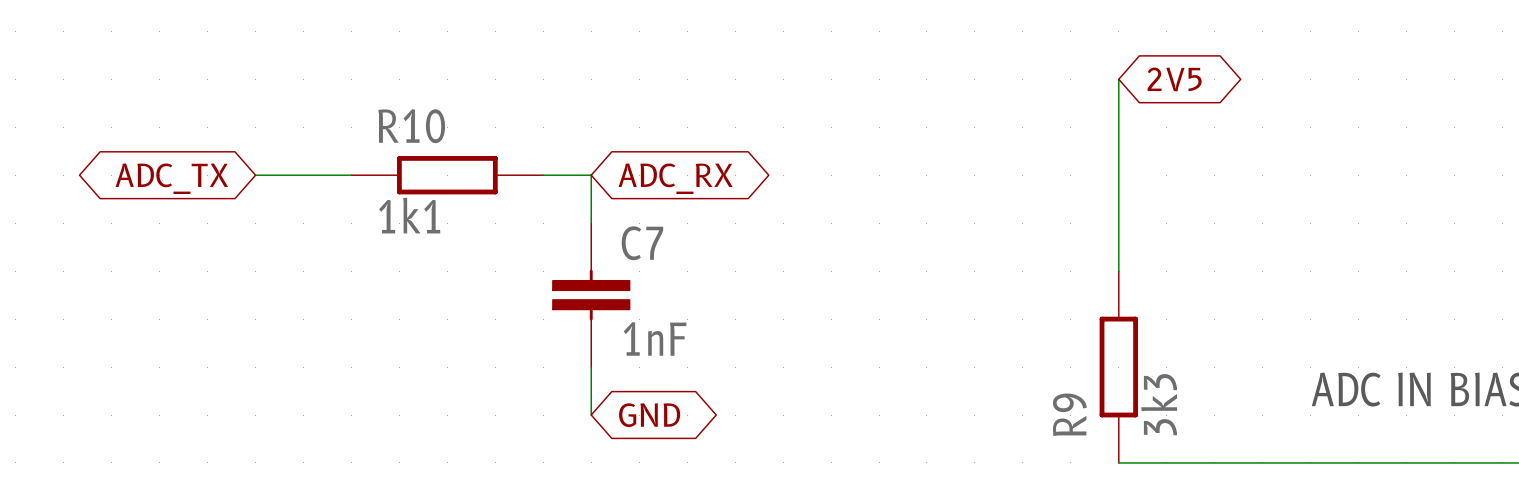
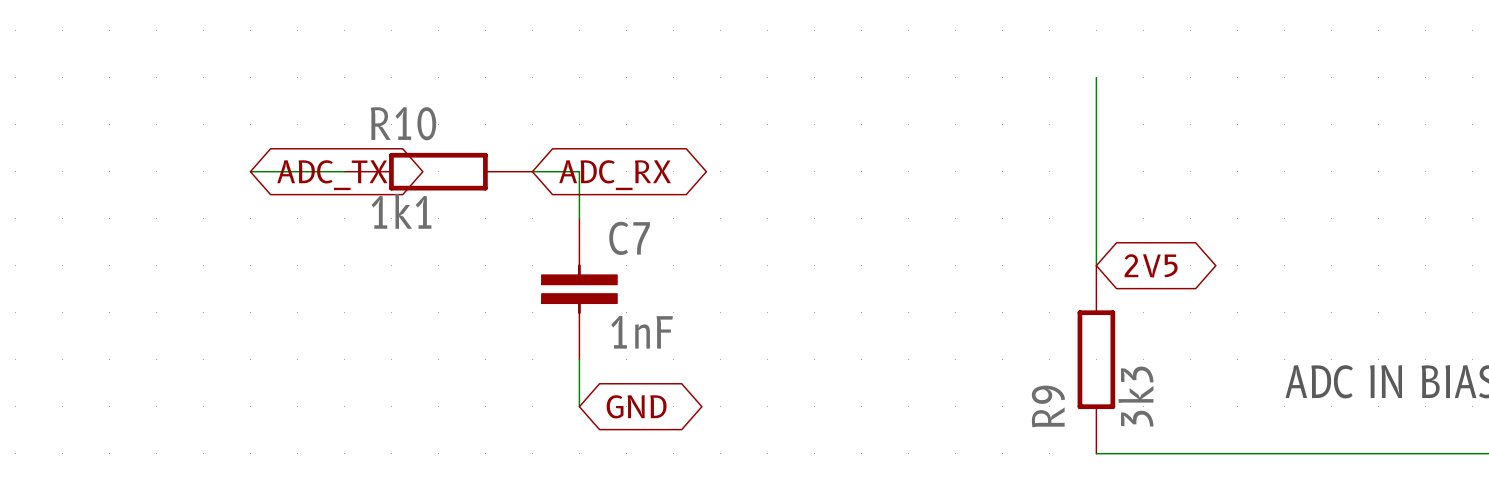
global label position: 2V5 (1174, 79) -> 2V5 (1151, 265)
global label rotation: 0° (171, 178) -> 180° (332, 175)
global label position: ADC_RX (675, 178) -> ADC_RX (615, 175)

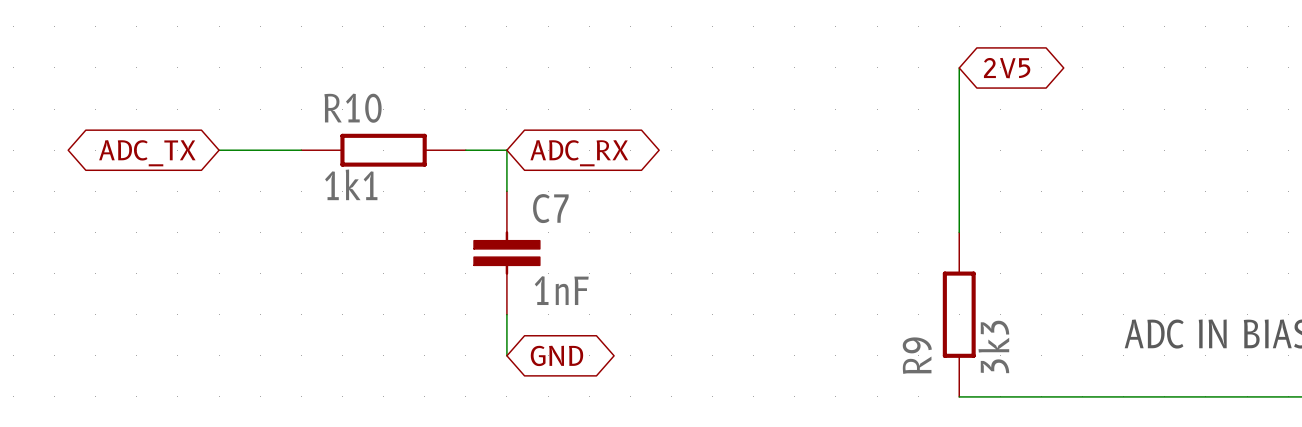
global label rotation: 0° (332, 175) -> 180° (147, 153)
global label position: ADC_RX (615, 175) -> ADC_RX (579, 153)
global label position: 2V5 (1151, 265) -> 2V5 (1007, 68)

